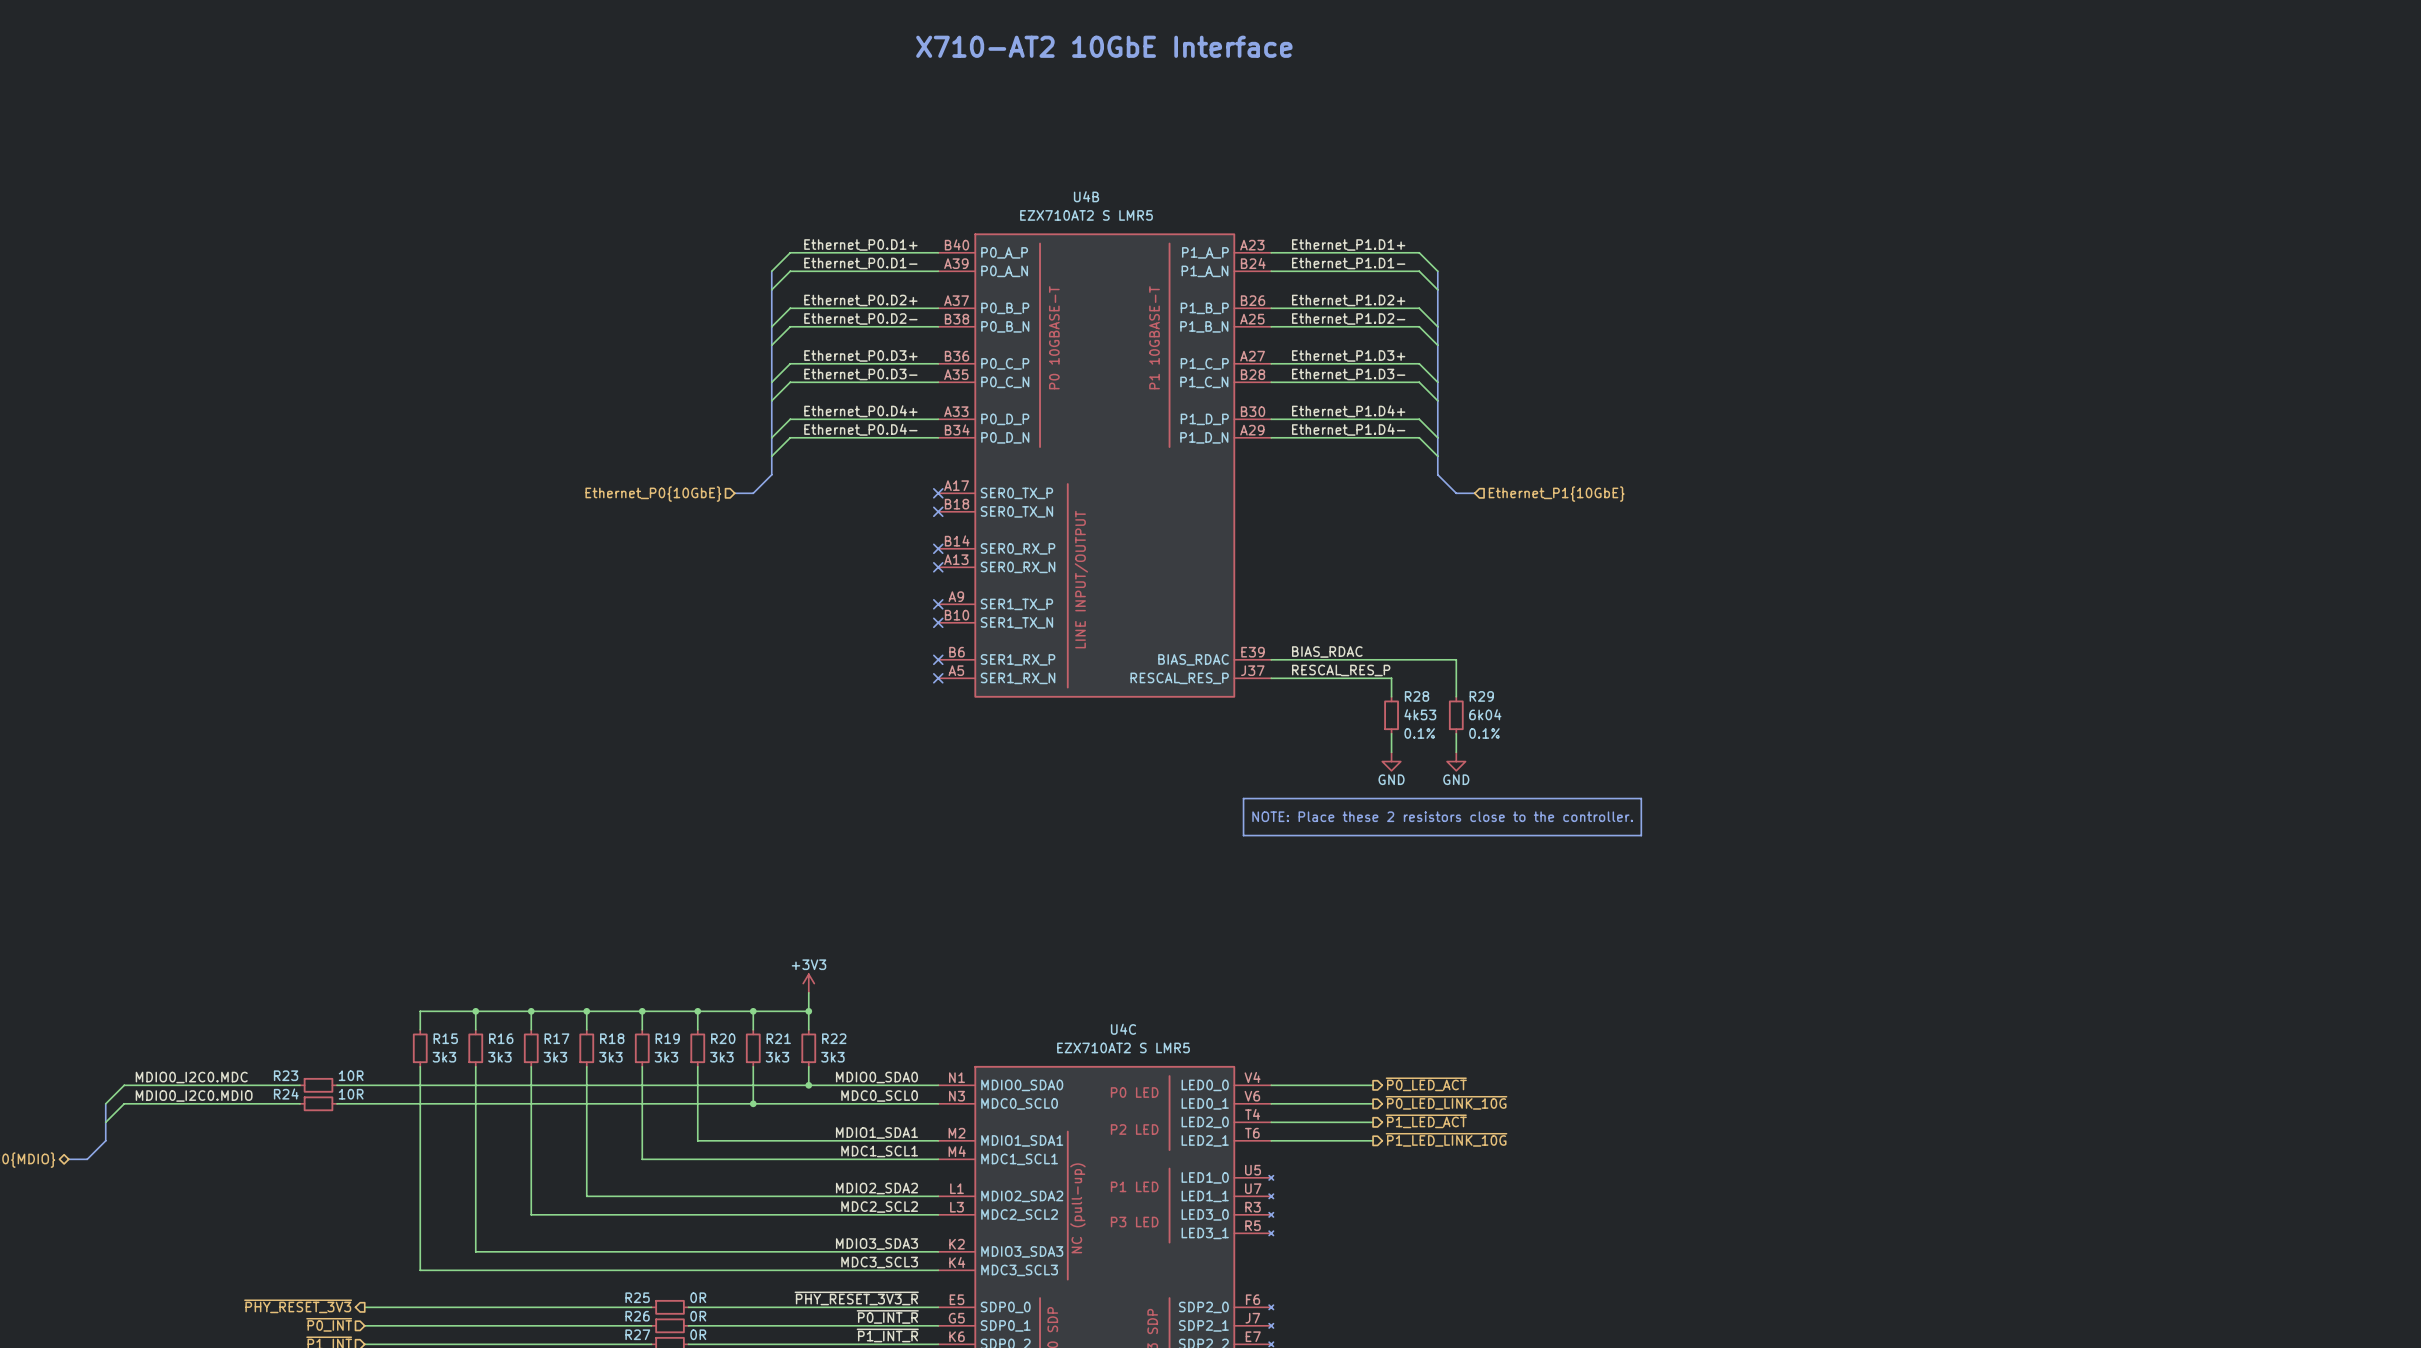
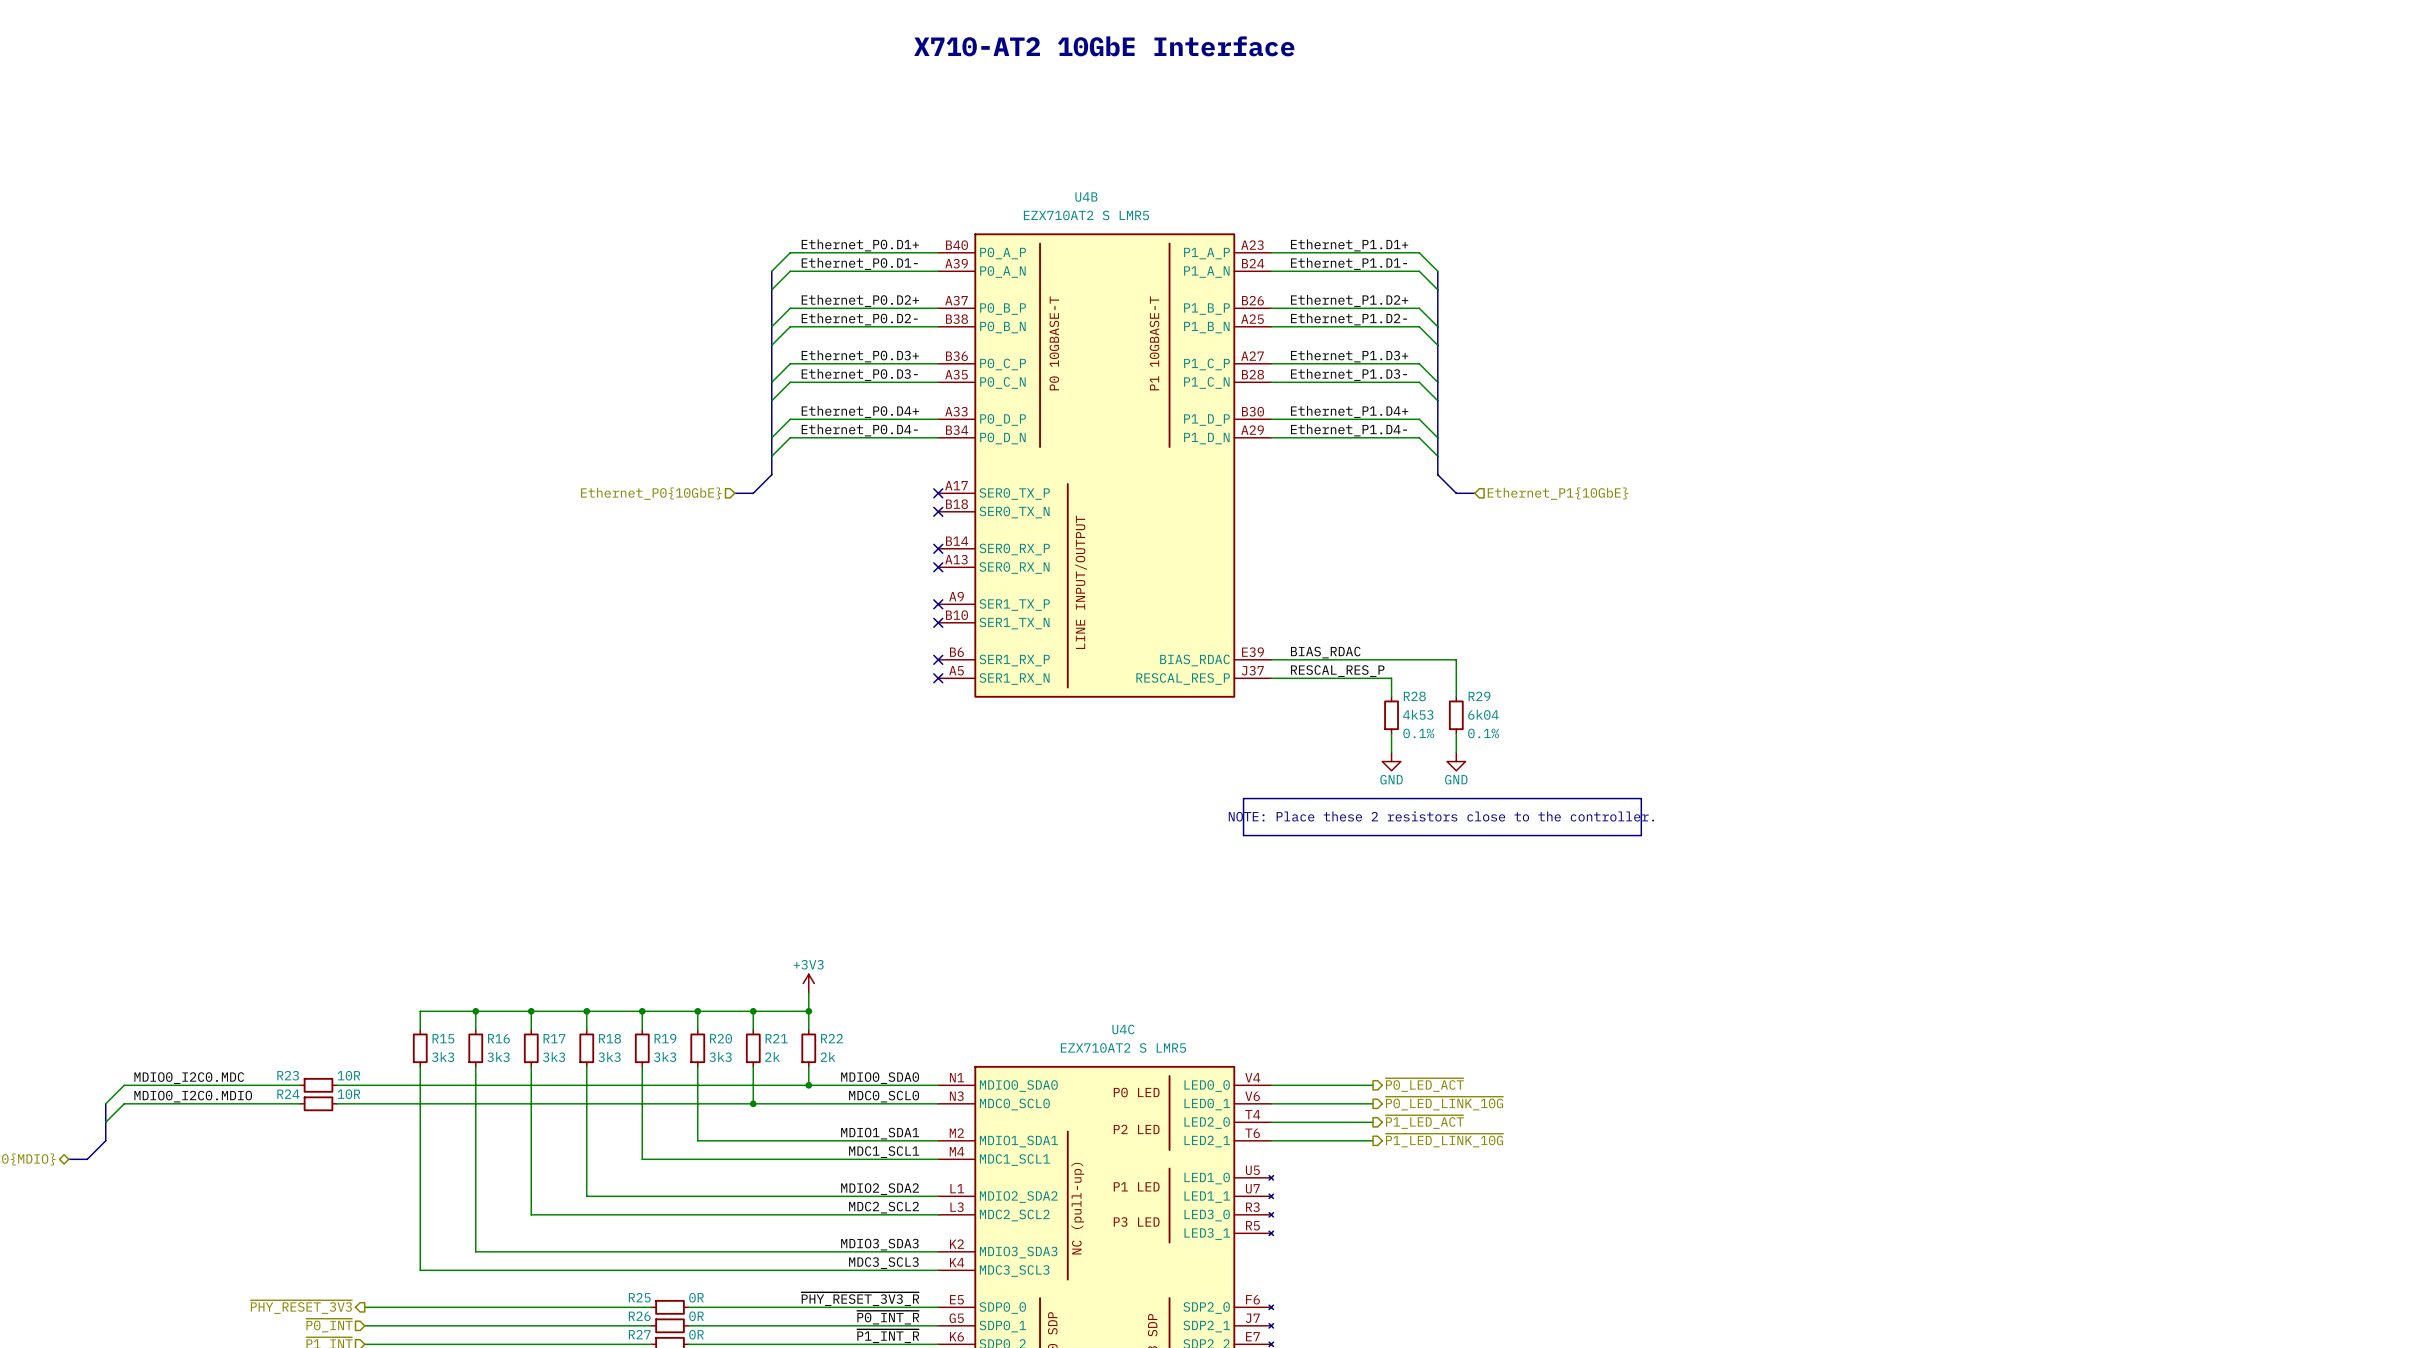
R21 text: 3k3 (777, 1057) -> 2k (772, 1056)
R22 text: 3k3 (832, 1057) -> 2k (828, 1056)

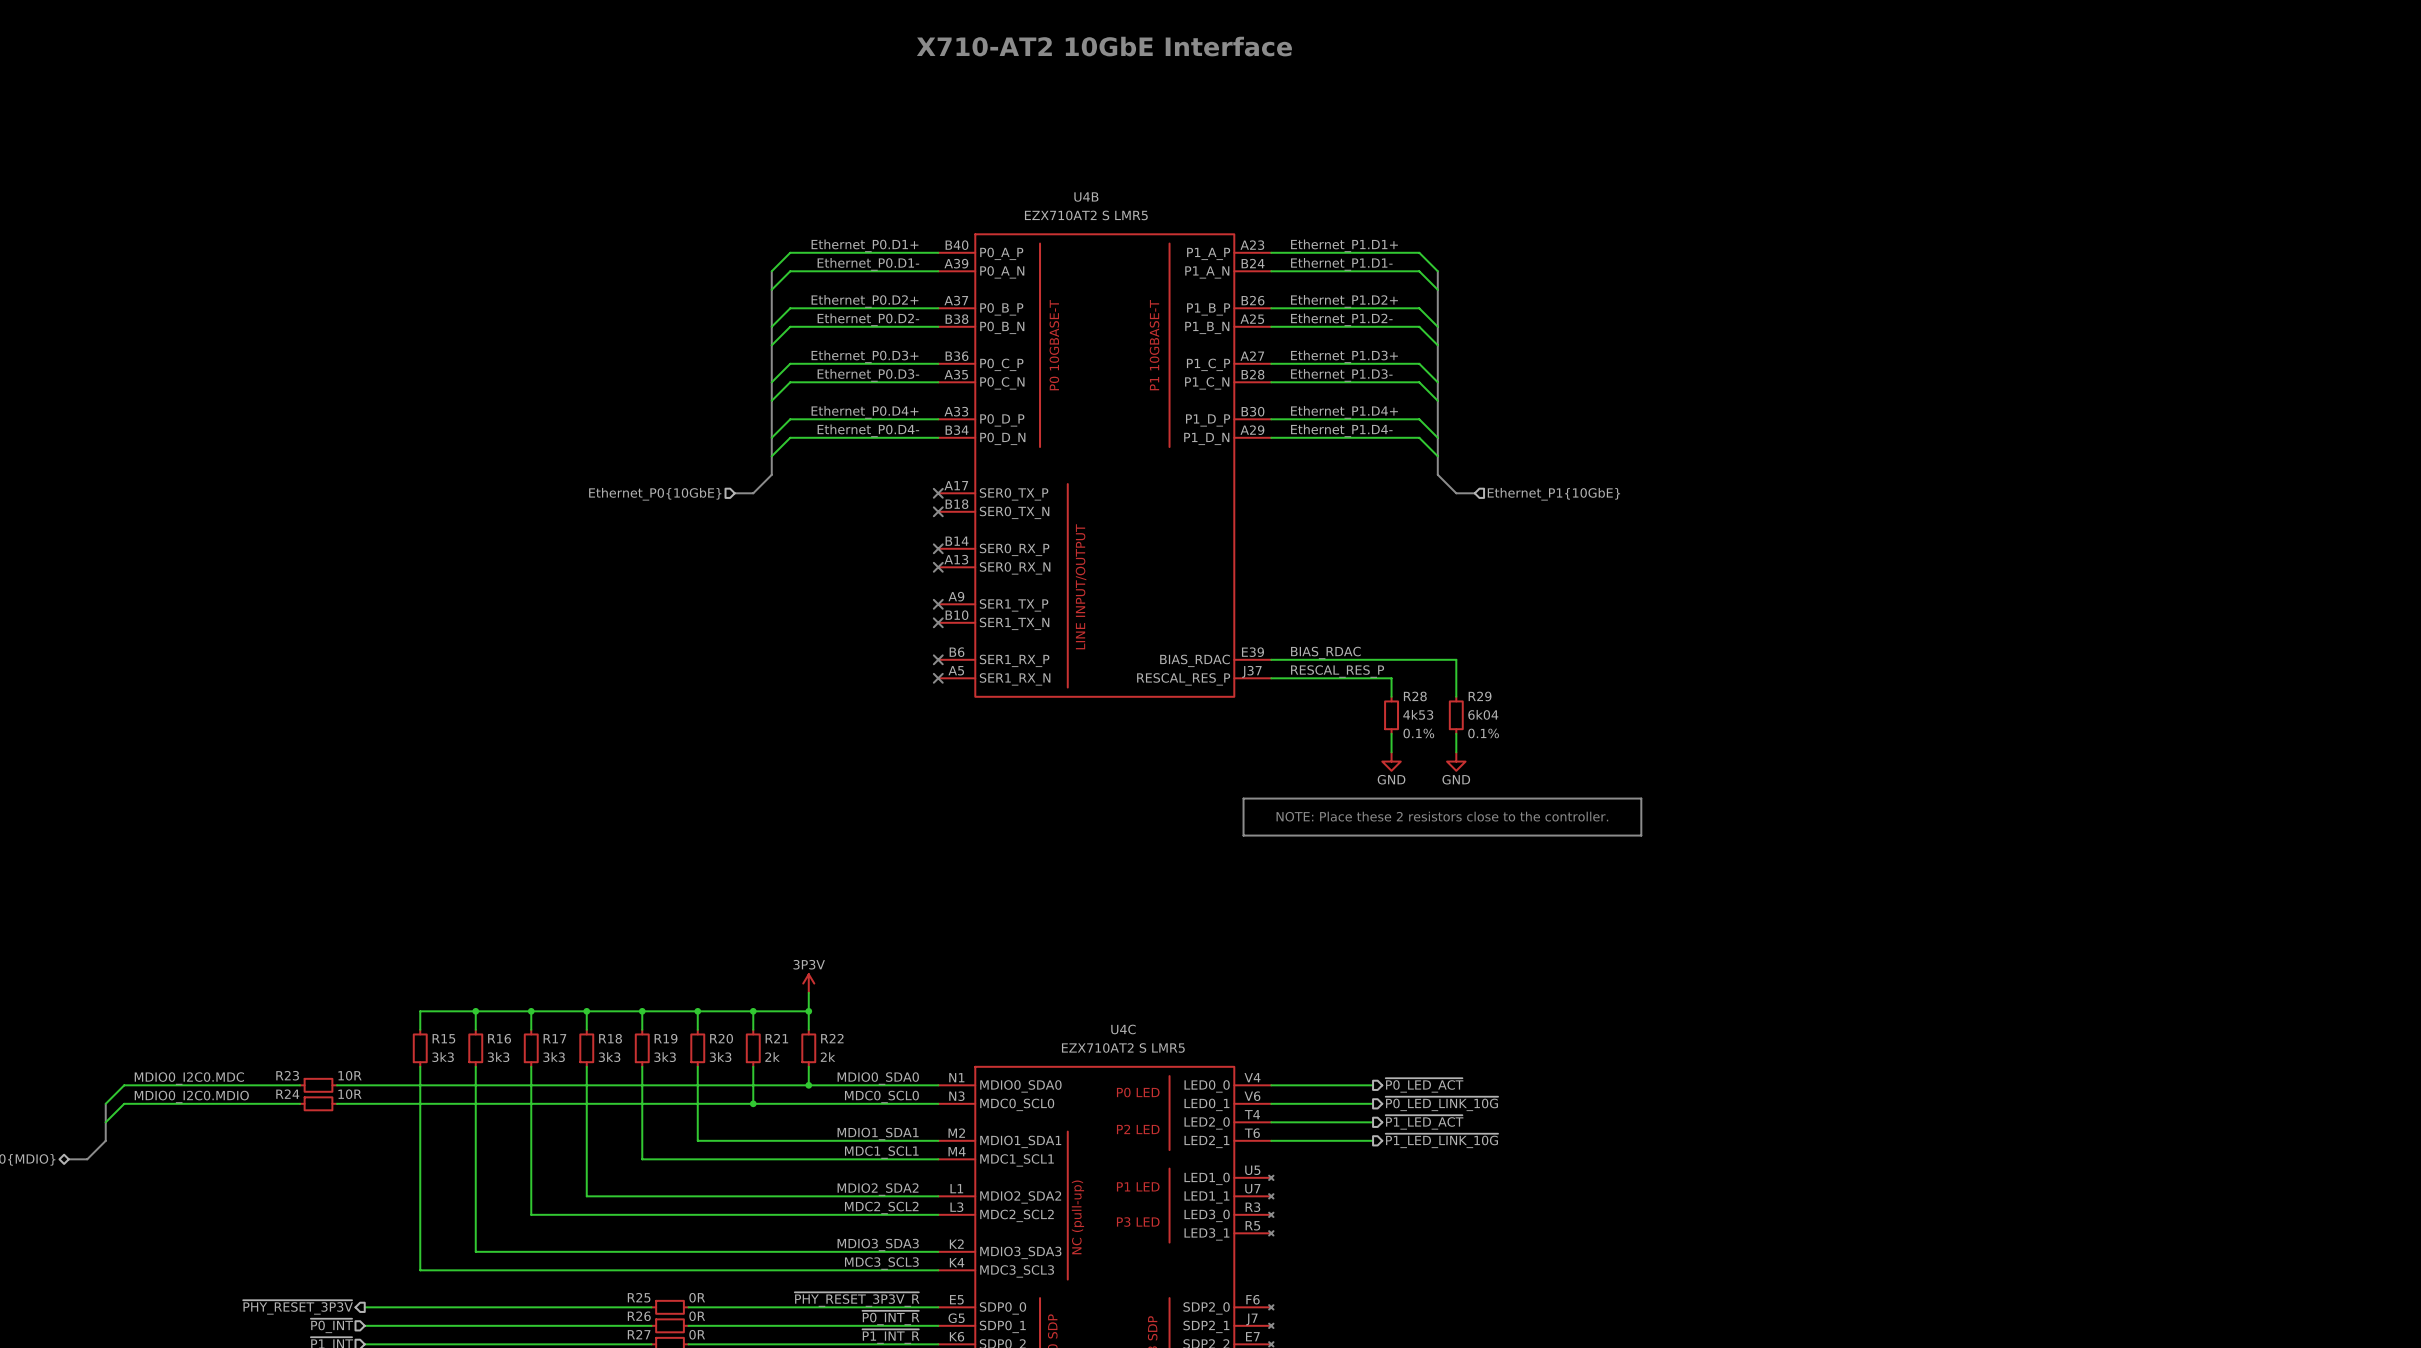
power symbol: +3V3 (808, 983) -> 3P3V (808, 983)
label: ~{PHY_RESET_3V3_R} (860, 1299) -> ~{PHY_RESET_3P3V_R} (857, 1299)
hierarchical label: ~{PHY_RESET_3V3} (301, 1307) -> ~{PHY_RESET_3P3V} (298, 1307)

